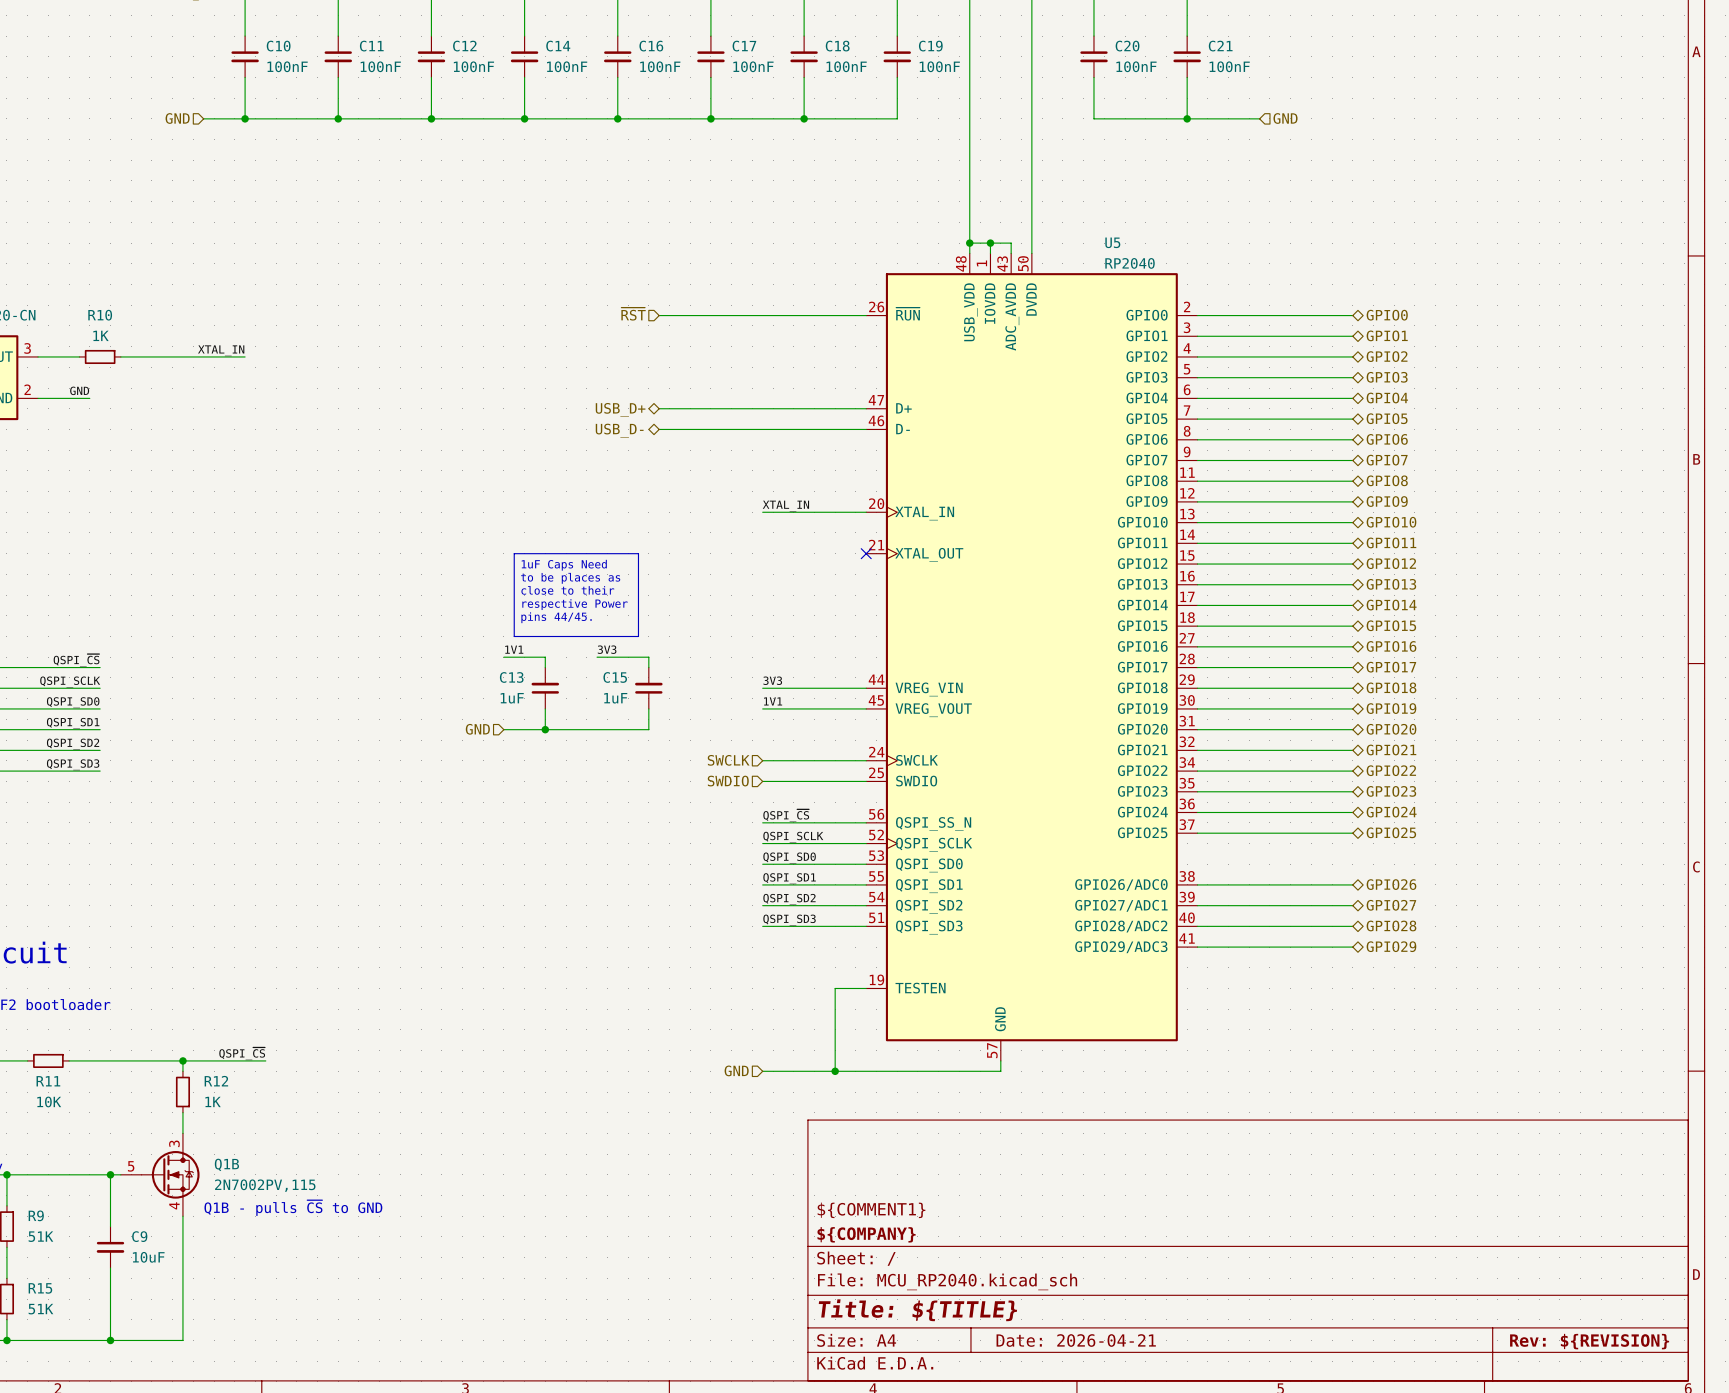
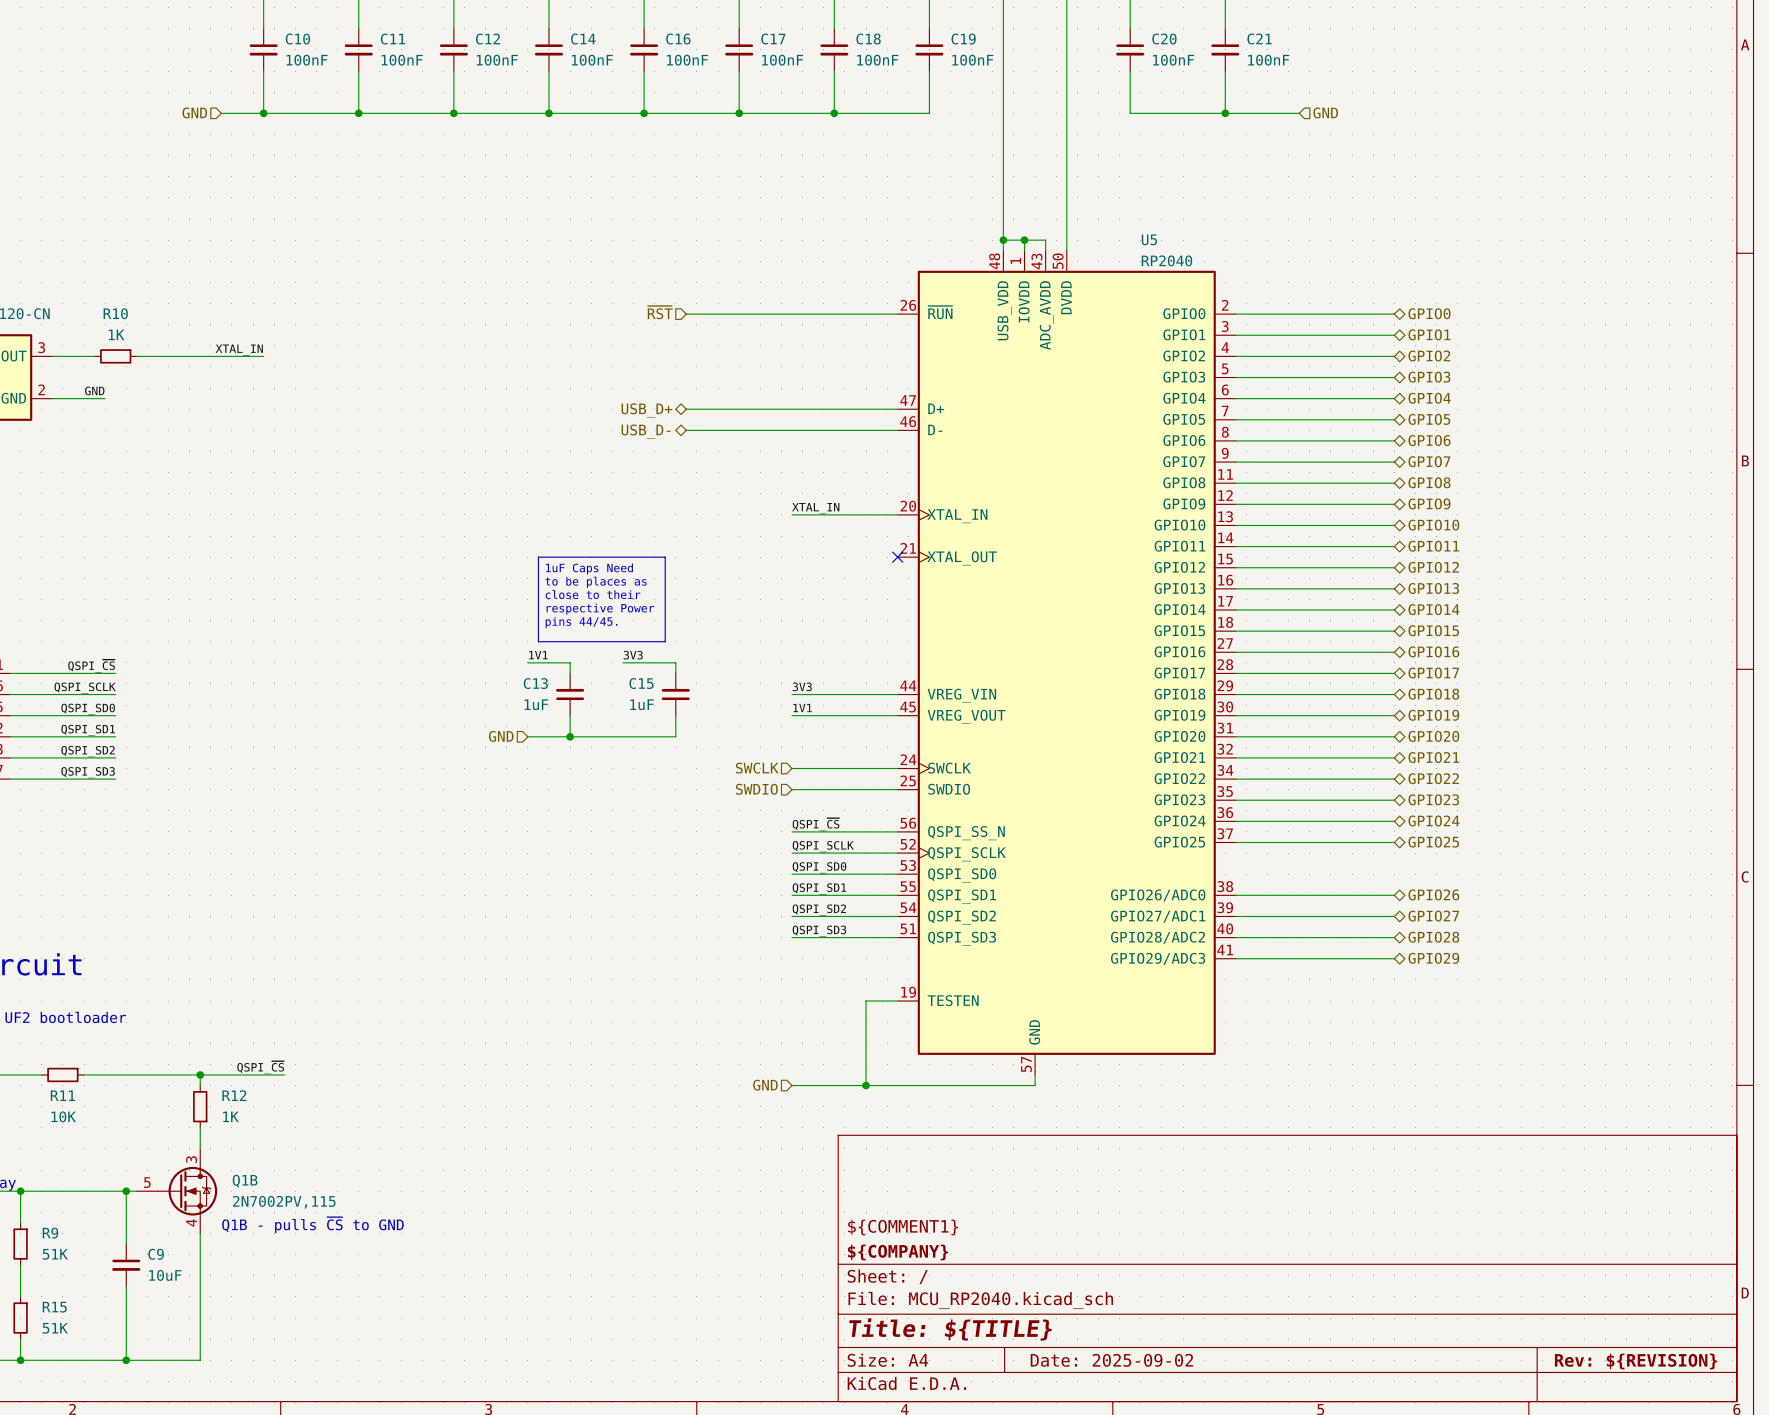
title block: Date: 2026-04-21 (1076, 1340) -> Date: 2025-09-02 (1111, 1360)

